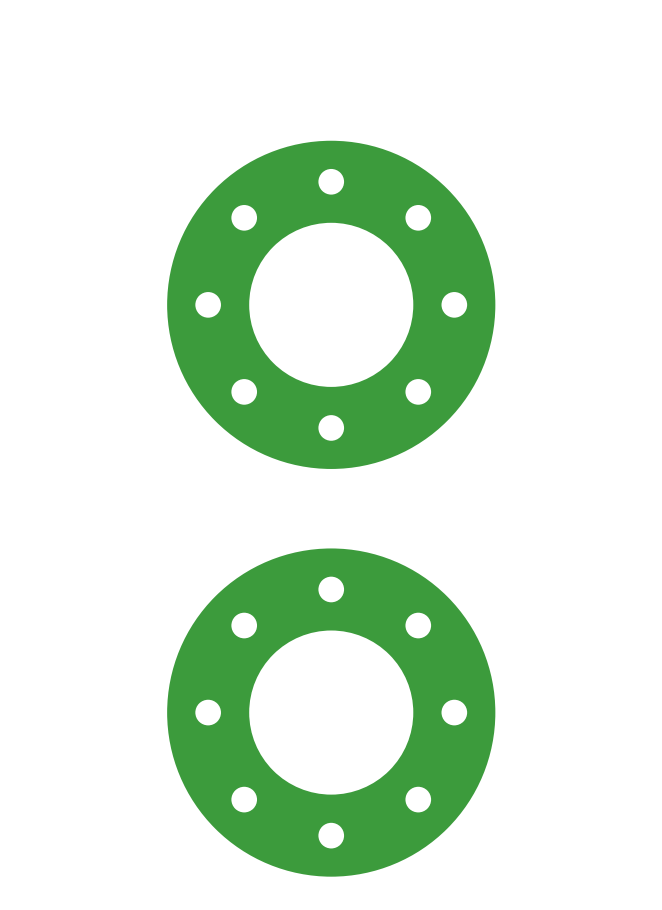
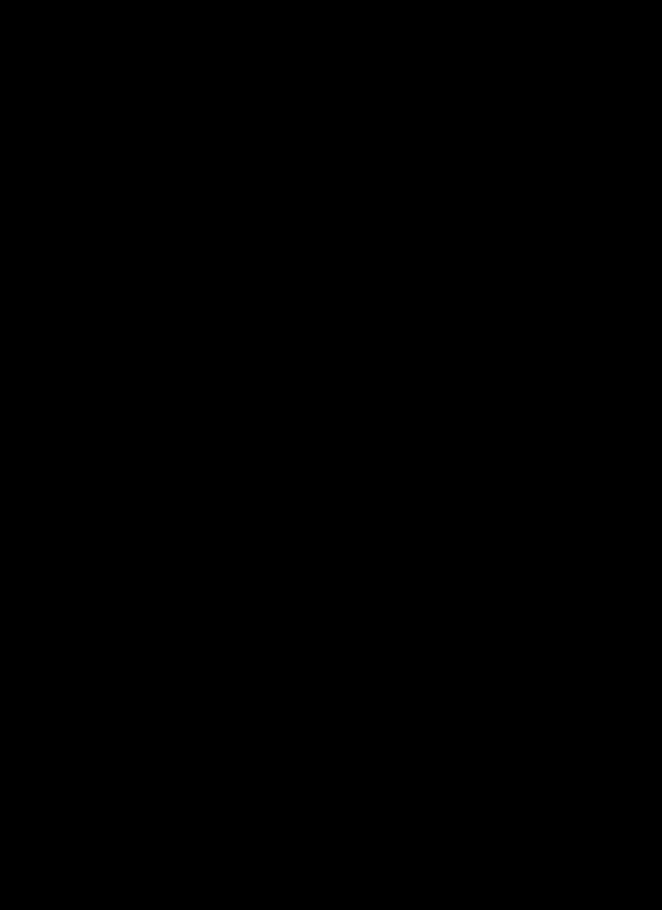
part: (331, 304) -> none
part: (331, 712) -> none

